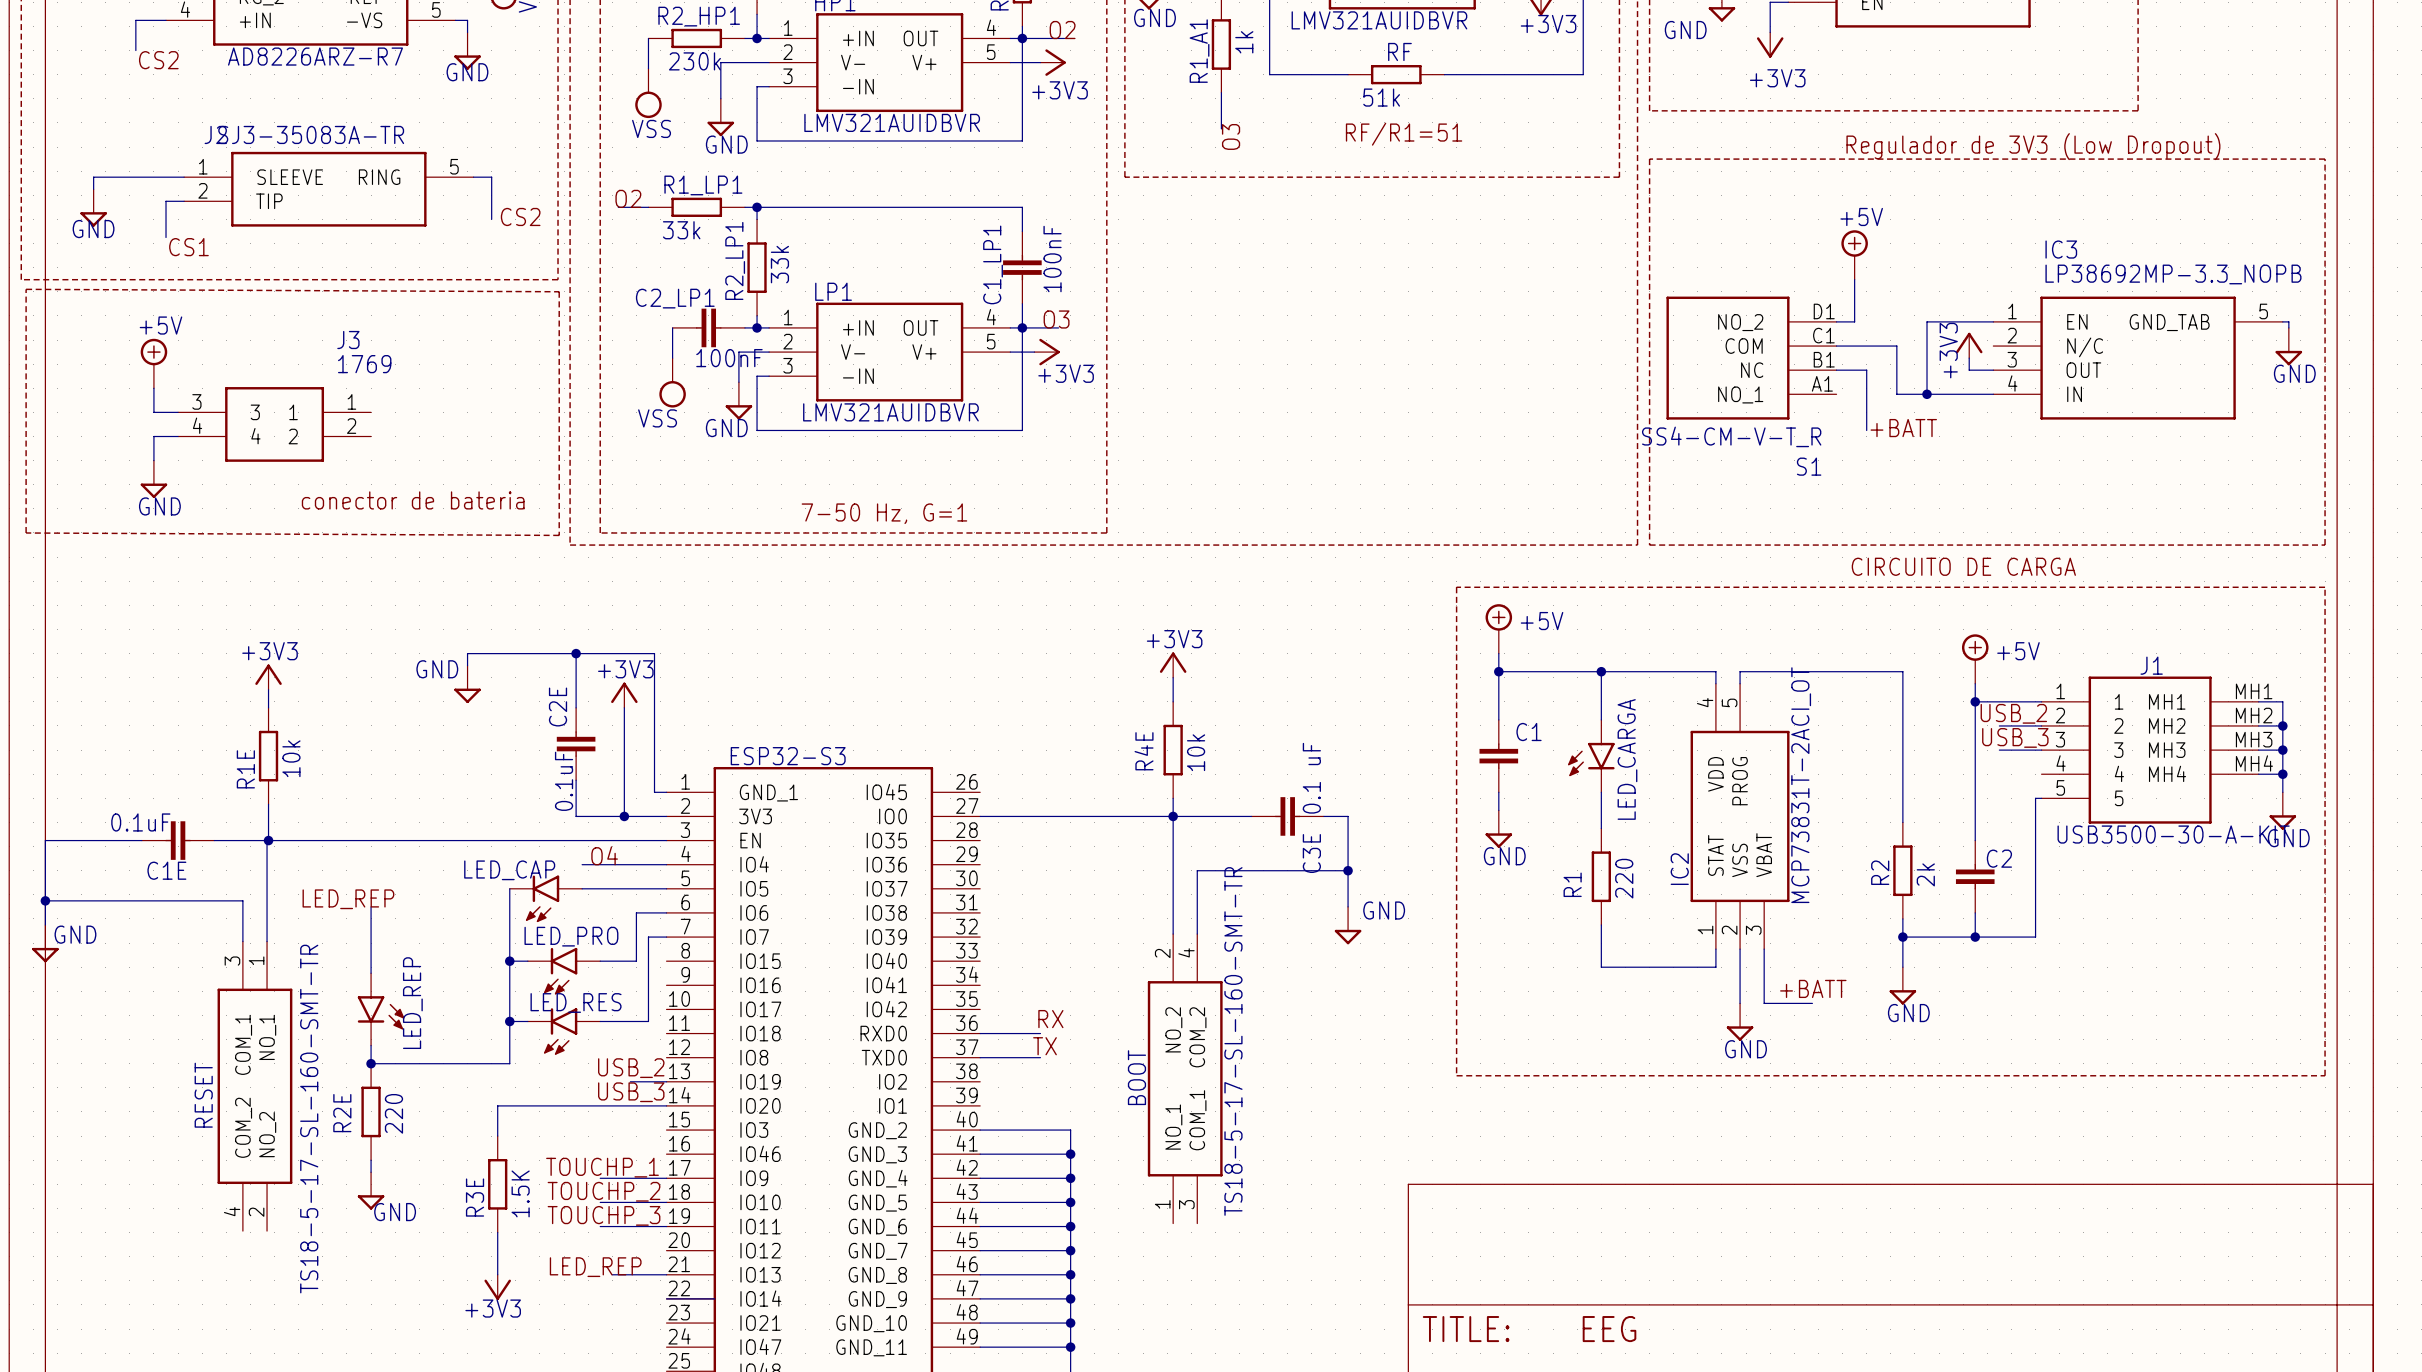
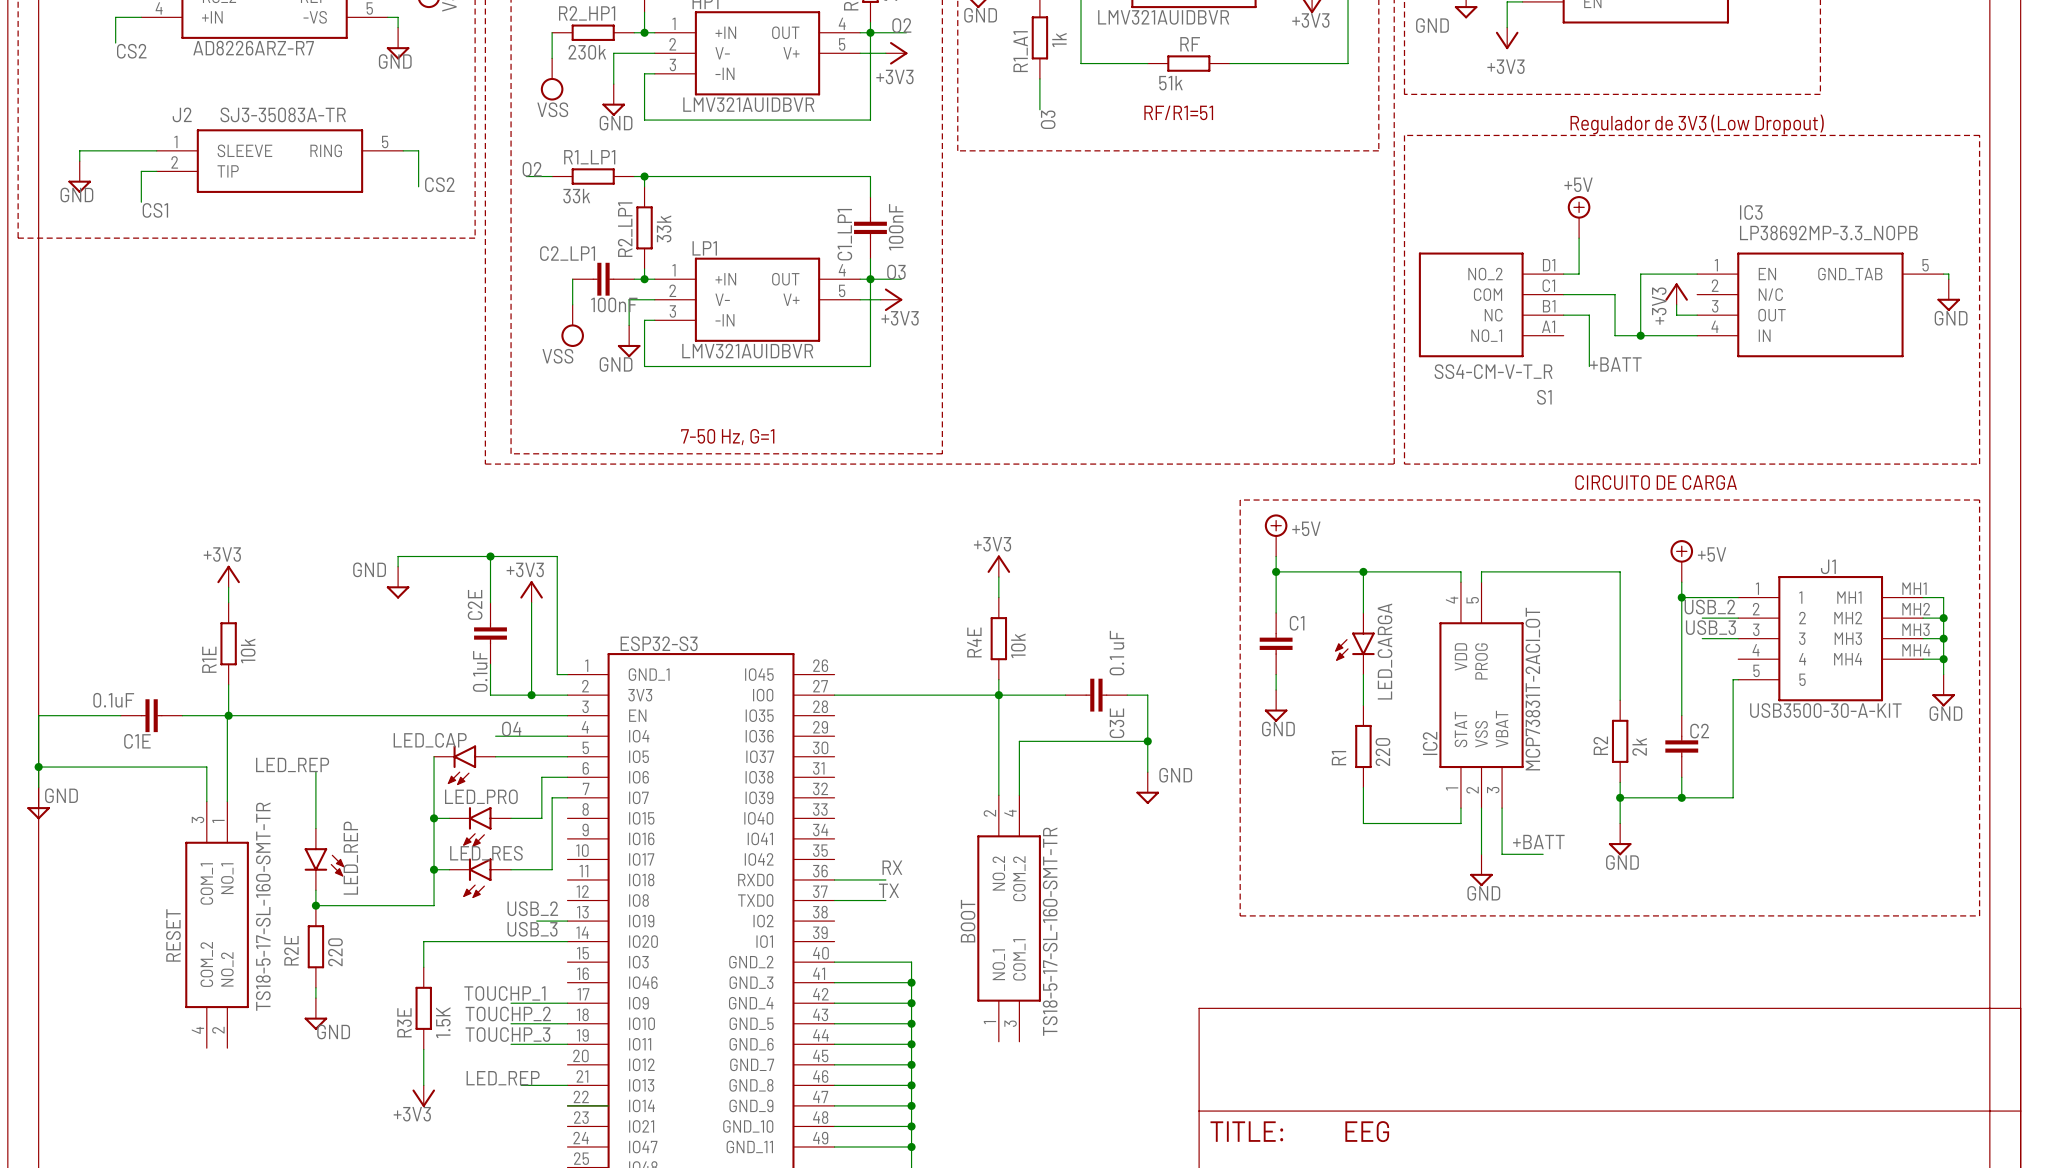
line: (26, 289) (559, 291) (559, 535) (26, 532) (26, 289) -> none
power symbol: +5V (153, 363) -> none
wire: (153, 388) (153, 412) (178, 412) -> none
J3: 1769 (274, 424) -> none
wire: (178, 436) (153, 436) (153, 460) -> none
power symbol: GND (153, 479) -> none
text: conector de bateria (413, 500) -> none

